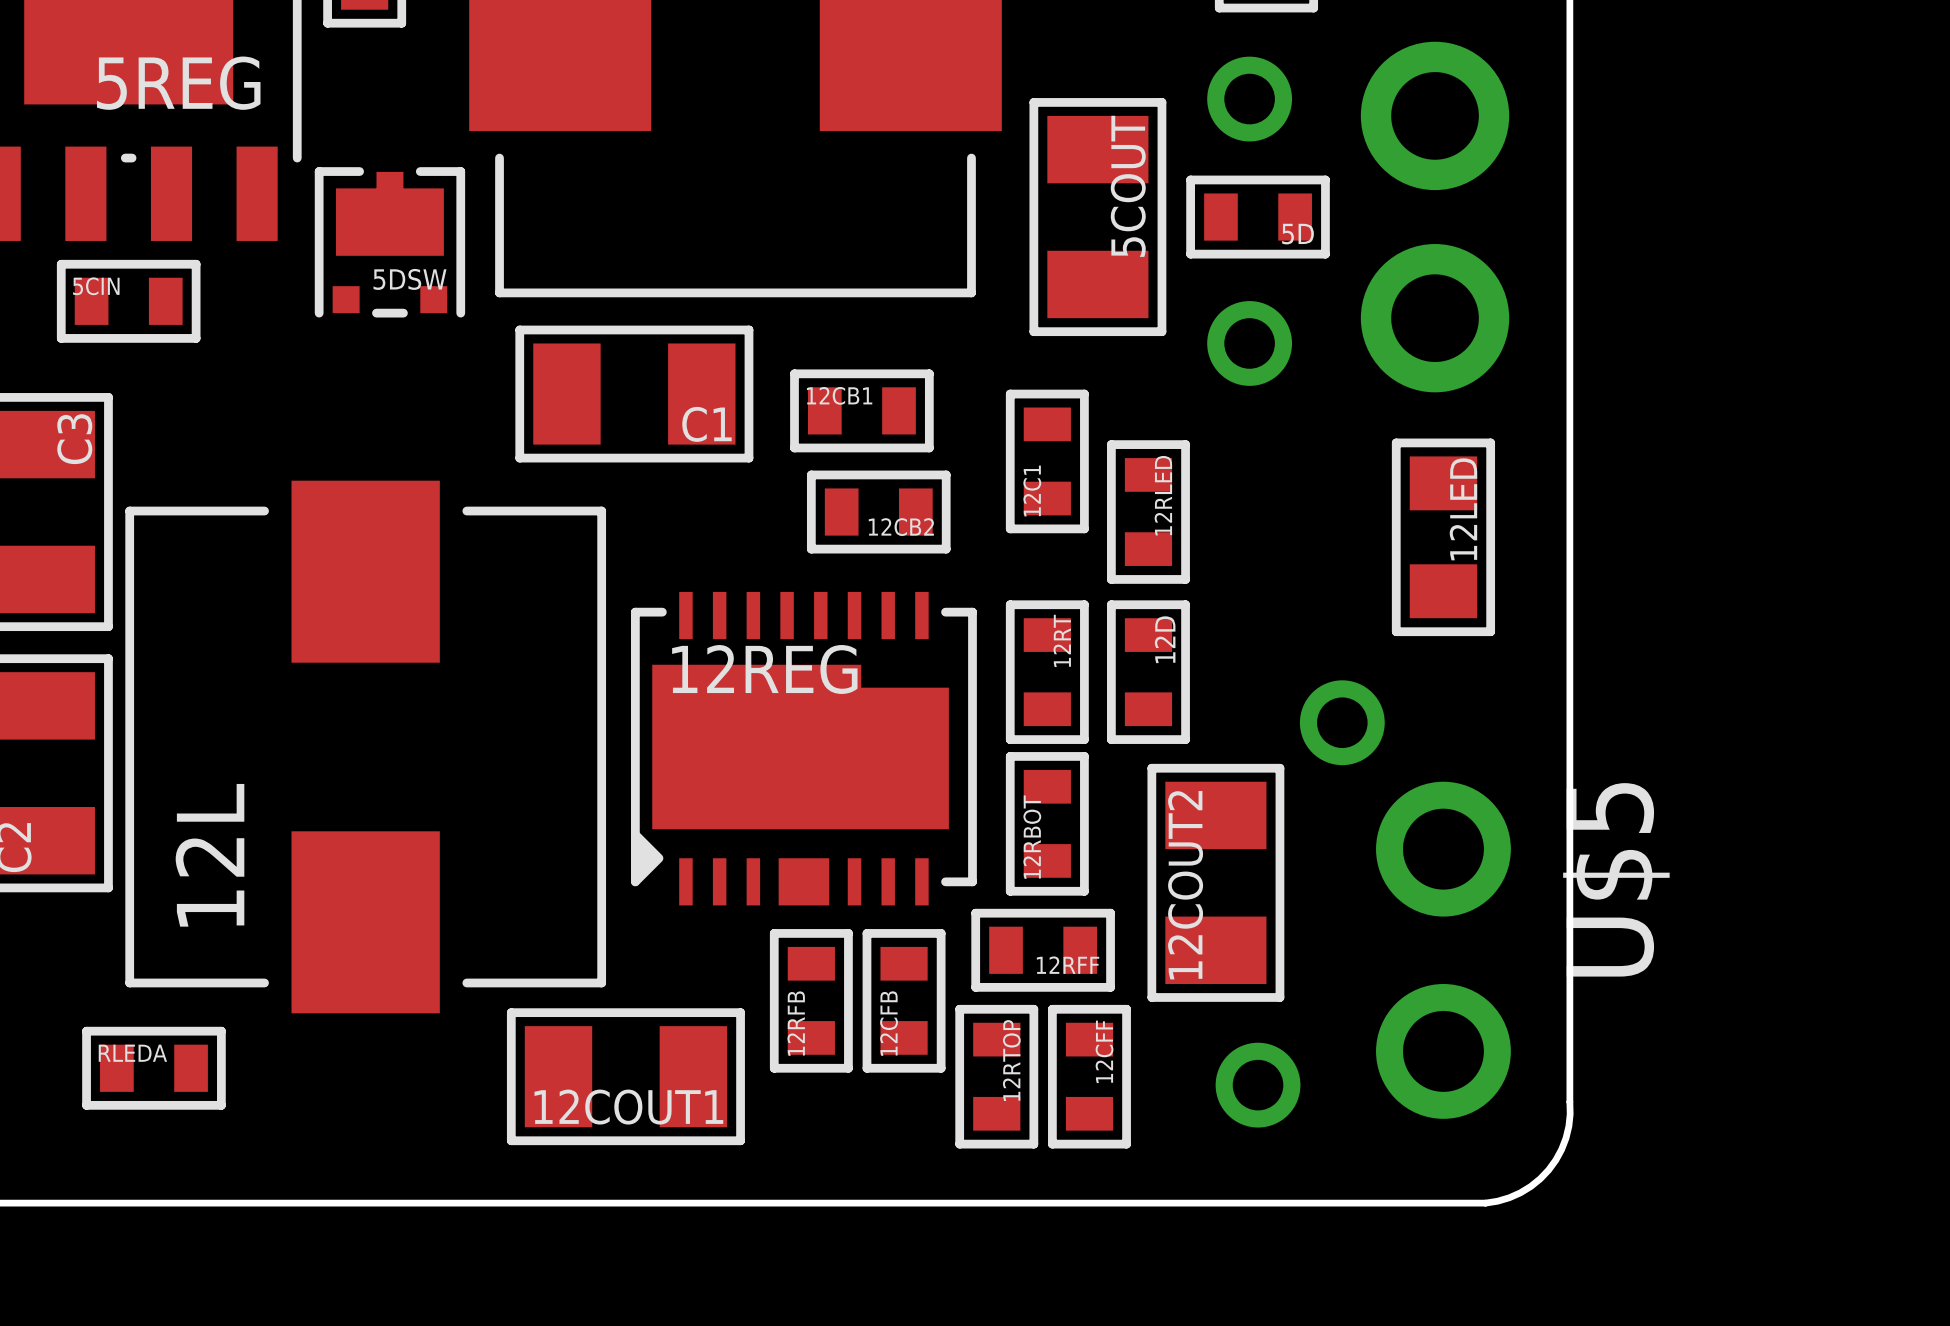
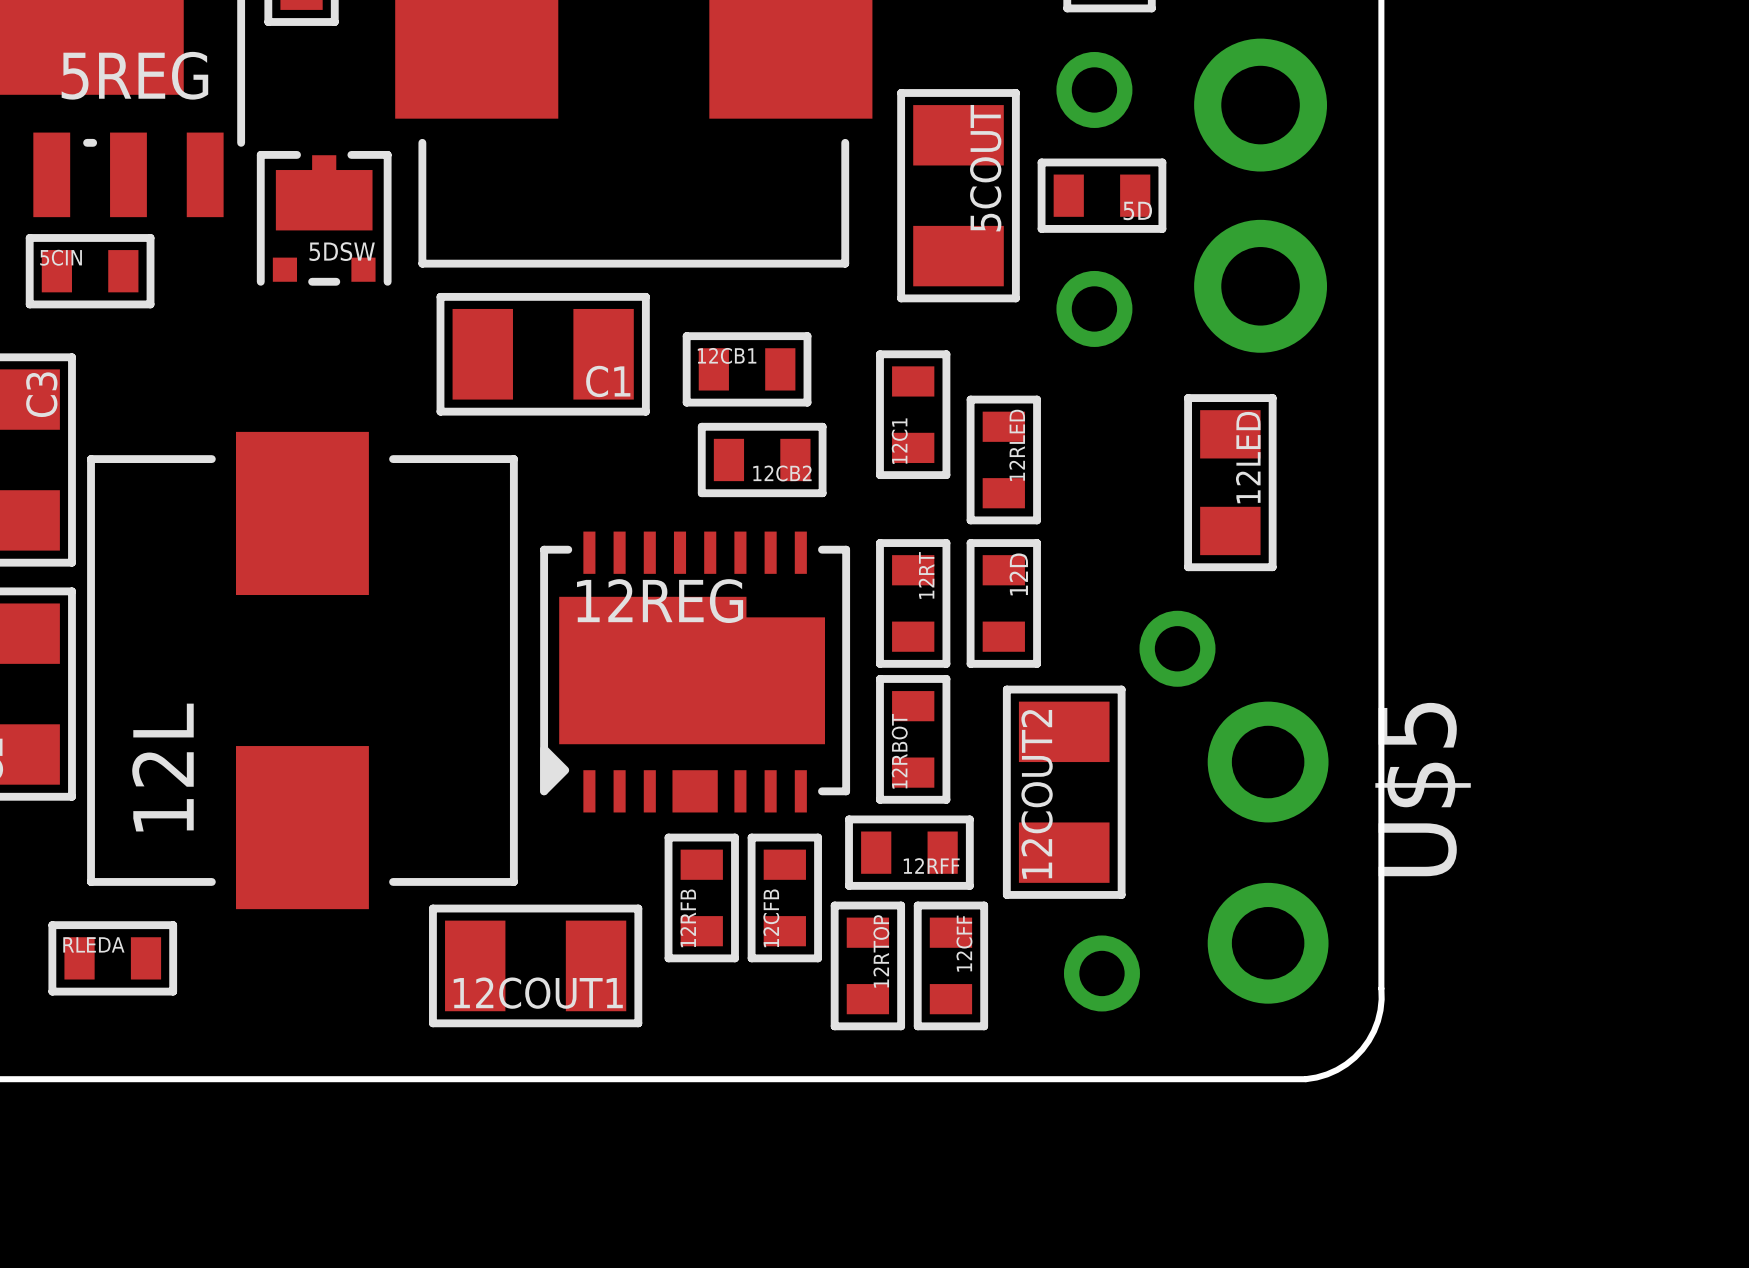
12LED position: (1443, 537) -> (1230, 482)

